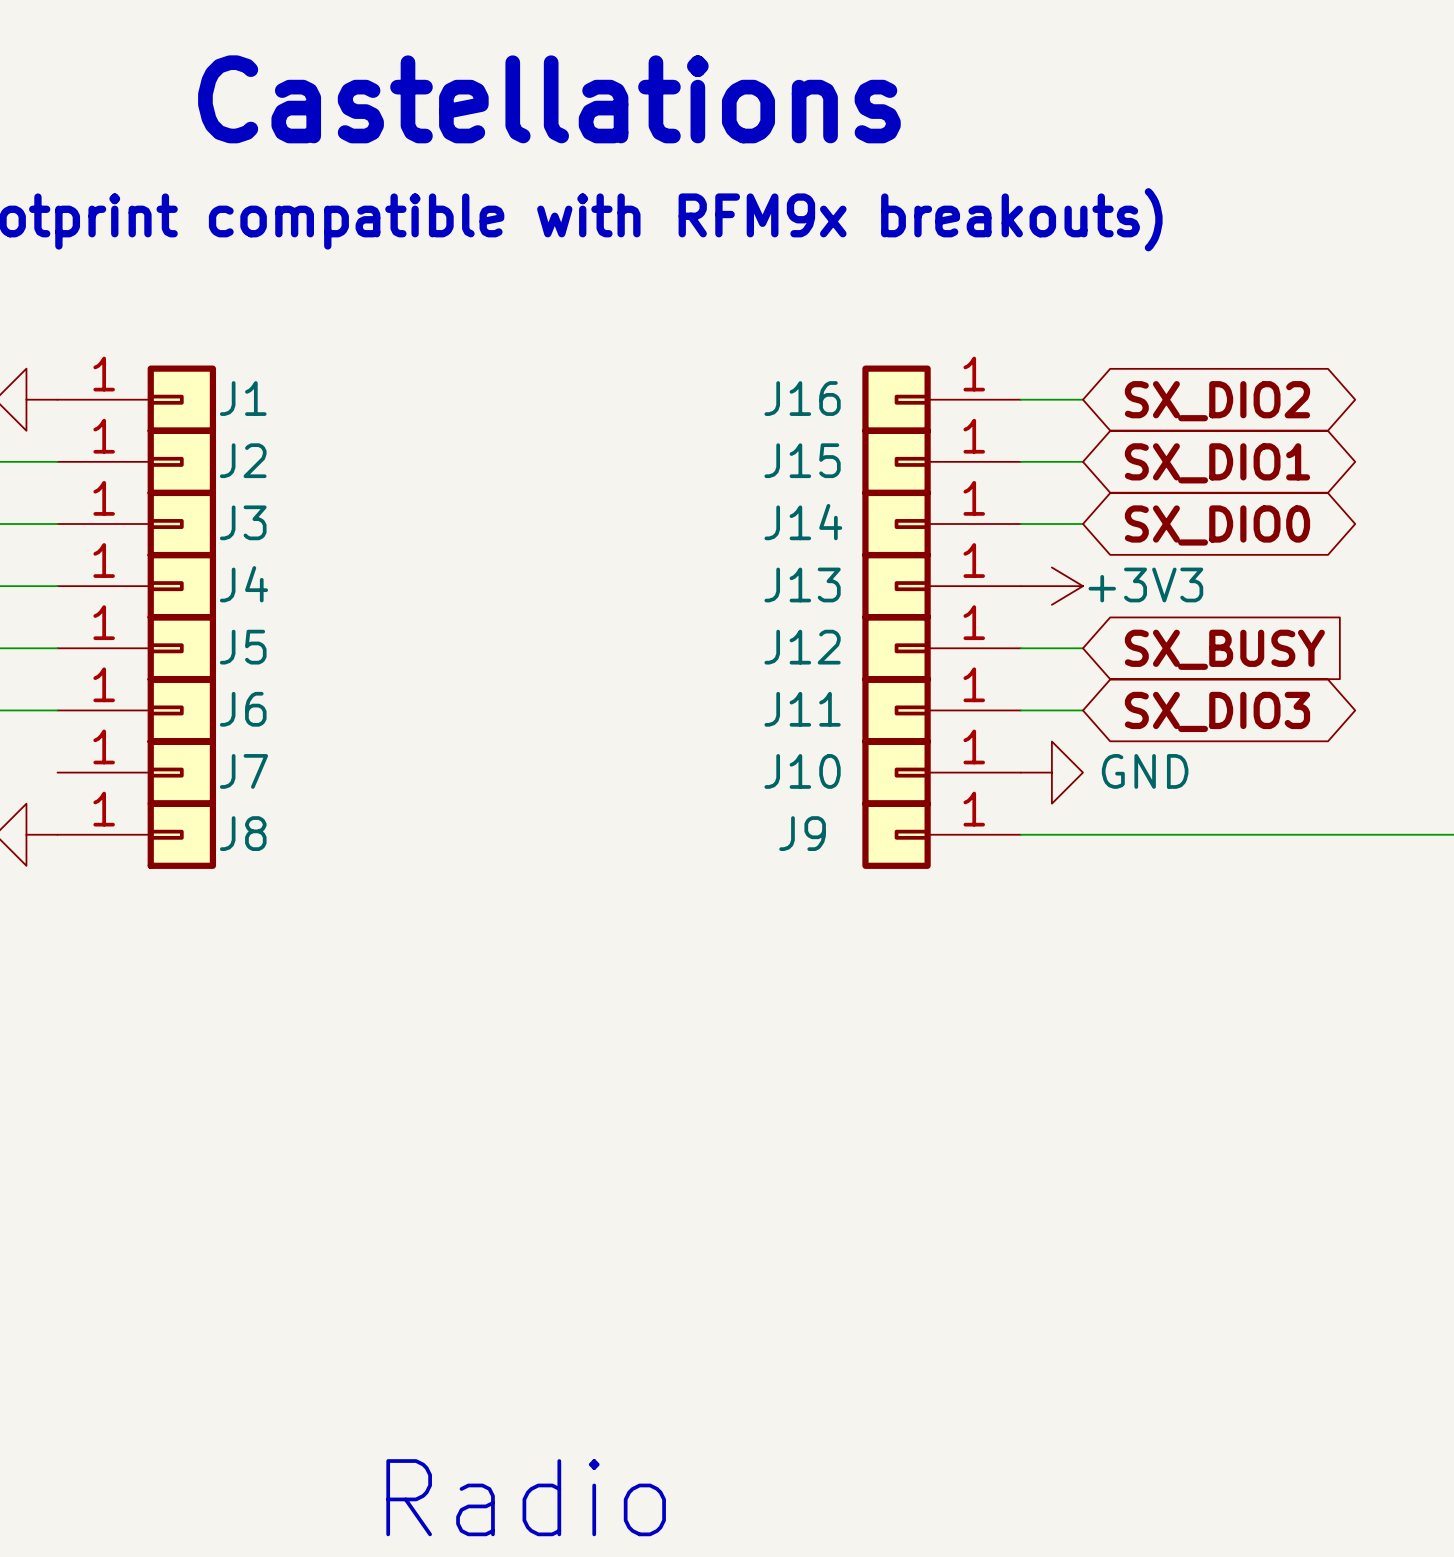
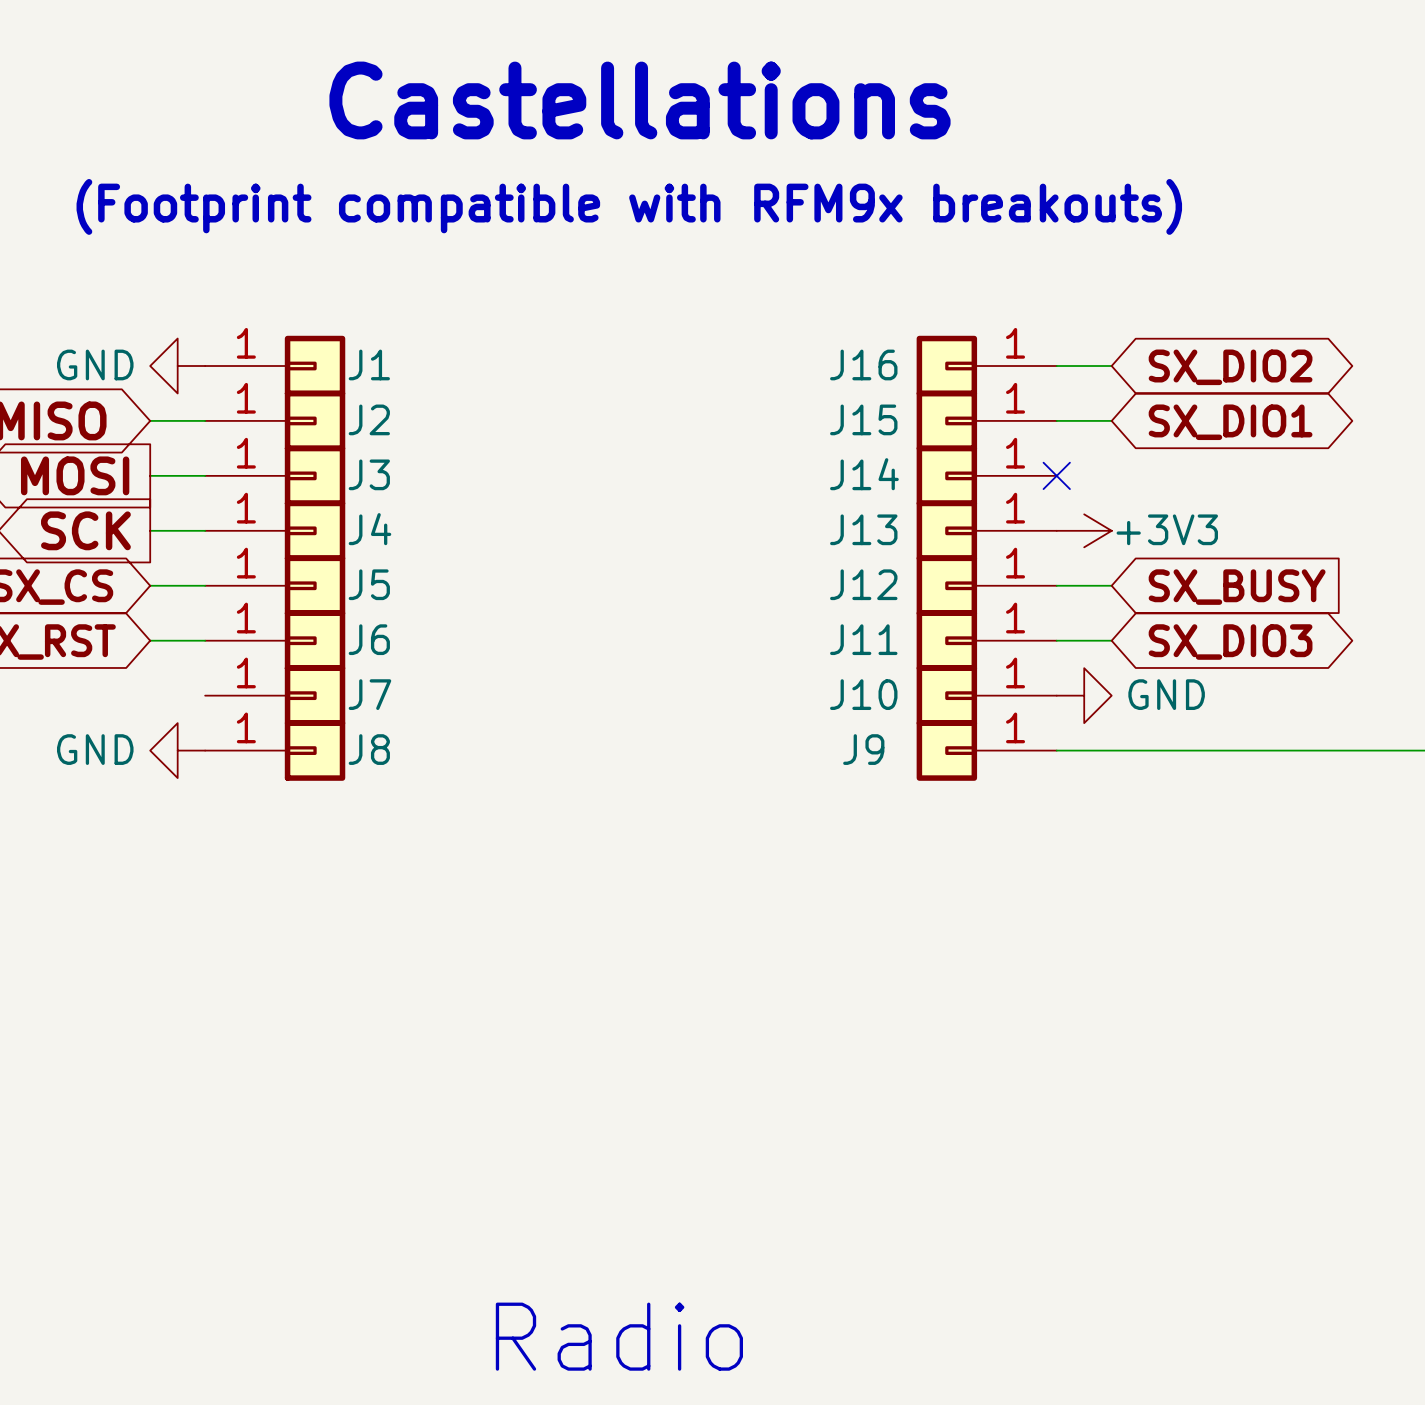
wire: (1020, 524) (1082, 524) -> none
no-connect mark: none -> (1056, 475)
global label: SX_DIO0 (1217, 525) -> none

